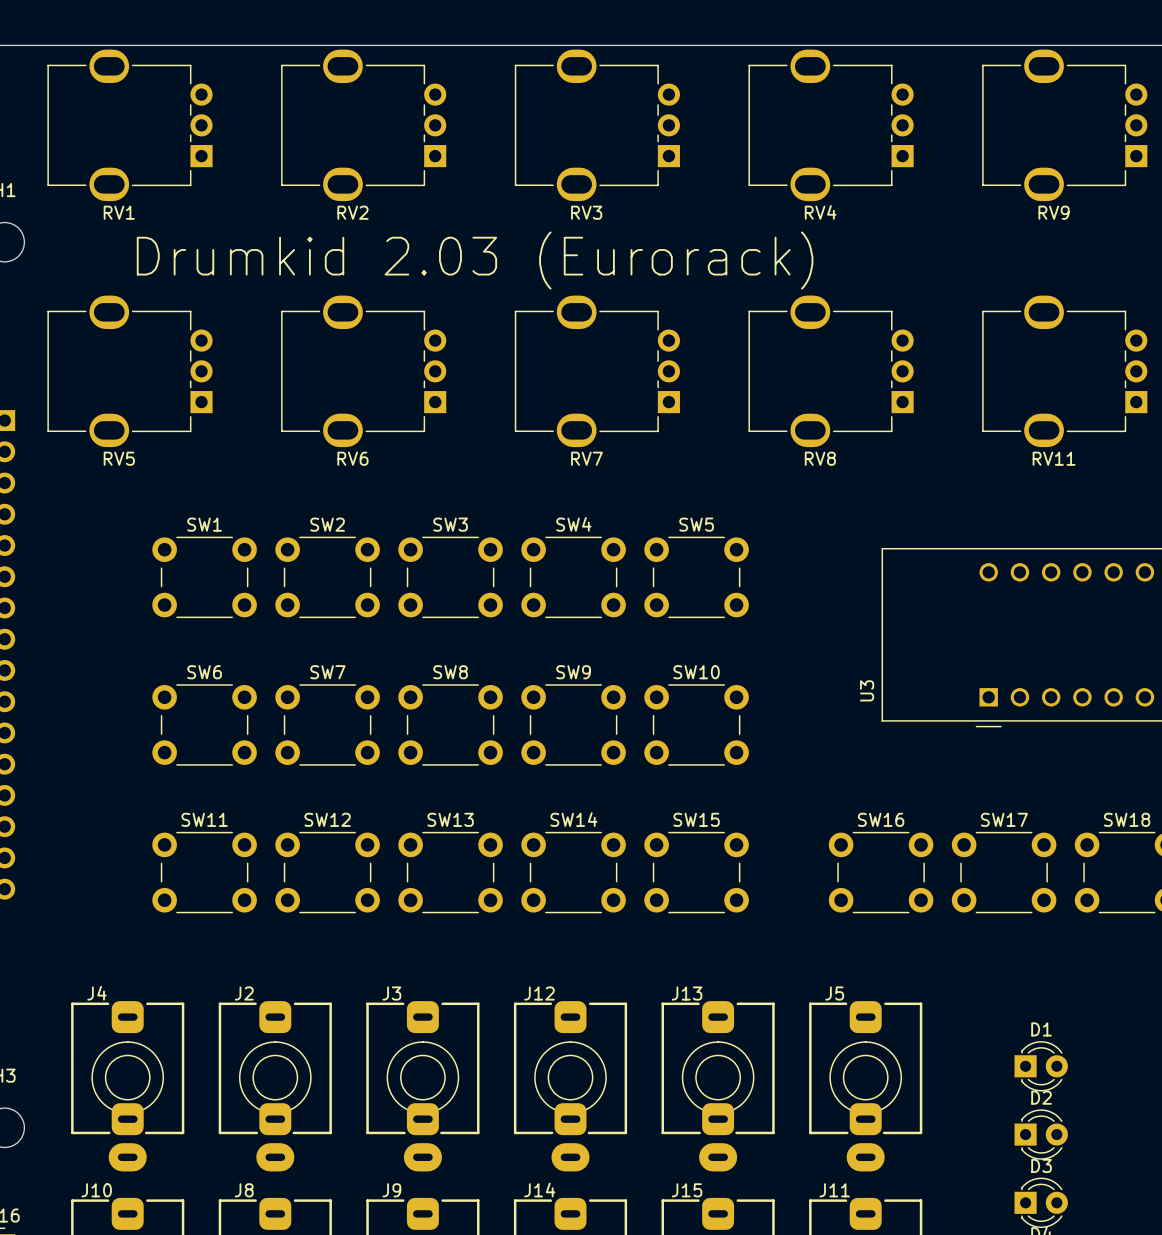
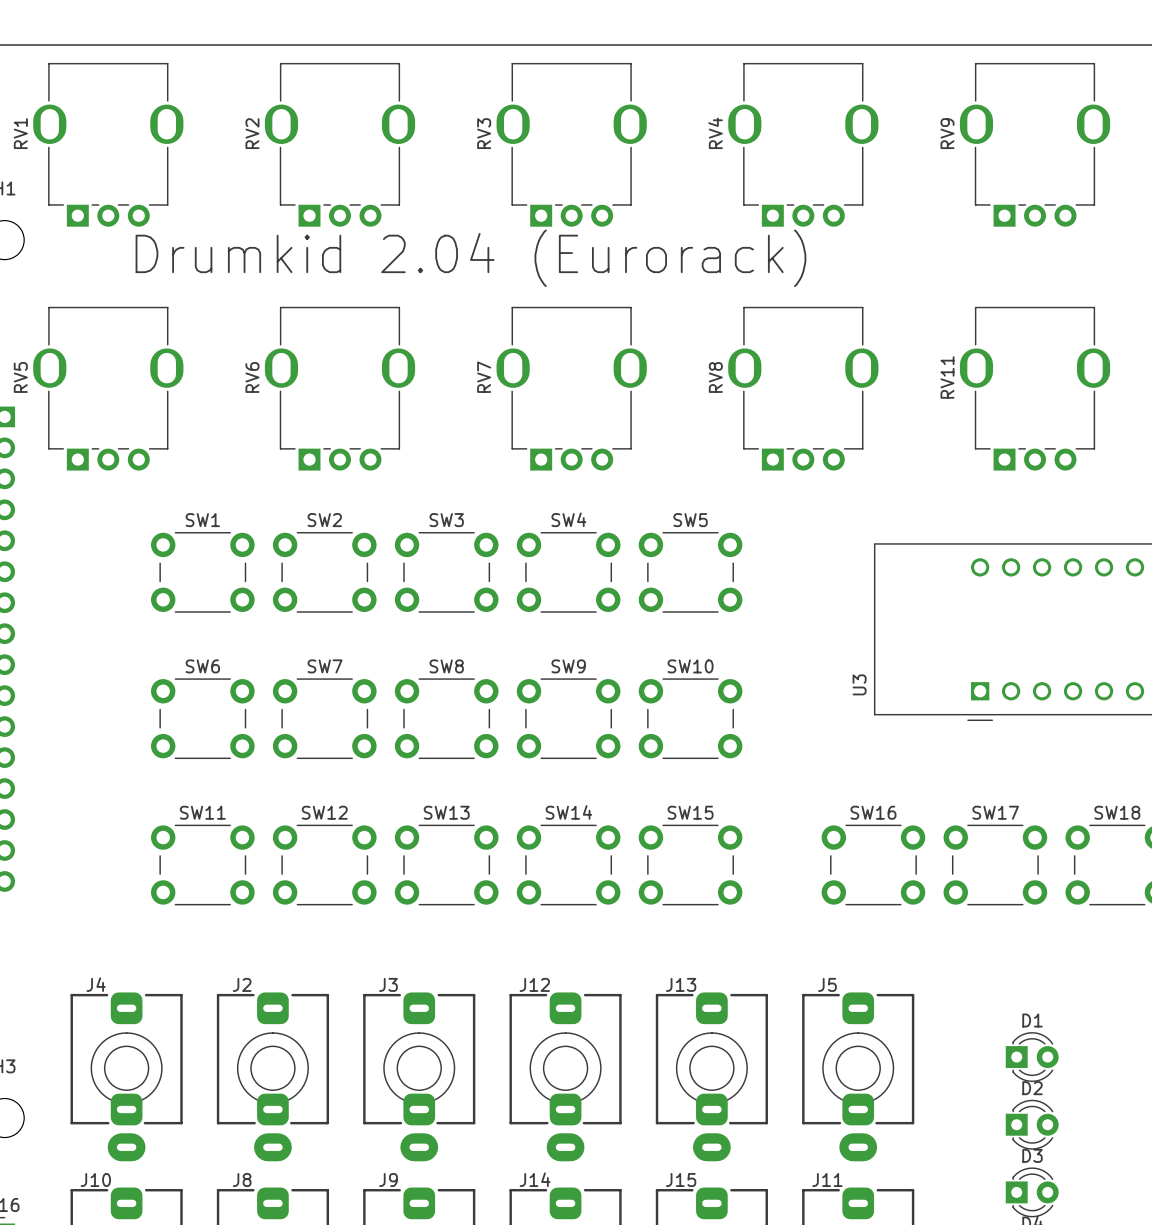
RV1 rotation: 0° (129, 125) -> 90° clockwise (108, 144)
RV2 rotation: 0° (363, 125) -> 90° clockwise (339, 144)
RV3 rotation: 0° (597, 125) -> 90° clockwise (571, 144)
RV4 rotation: 0° (831, 125) -> 90° clockwise (803, 144)
RV9 rotation: 0° (1064, 125) -> 90° clockwise (1035, 144)
text: Drumkid 2.03 (Eurorack) (475, 260) -> Drumkid 2.04 (Eurorack) (470, 258)
RV5 rotation: 0° (129, 371) -> 90° clockwise (108, 388)
RV6 rotation: 0° (363, 371) -> 90° clockwise (339, 388)
RV7 rotation: 0° (597, 371) -> 90° clockwise (571, 388)
RV8 rotation: 0° (831, 371) -> 90° clockwise (803, 388)
RV11 rotation: 0° (1064, 371) -> 90° clockwise (1035, 388)

